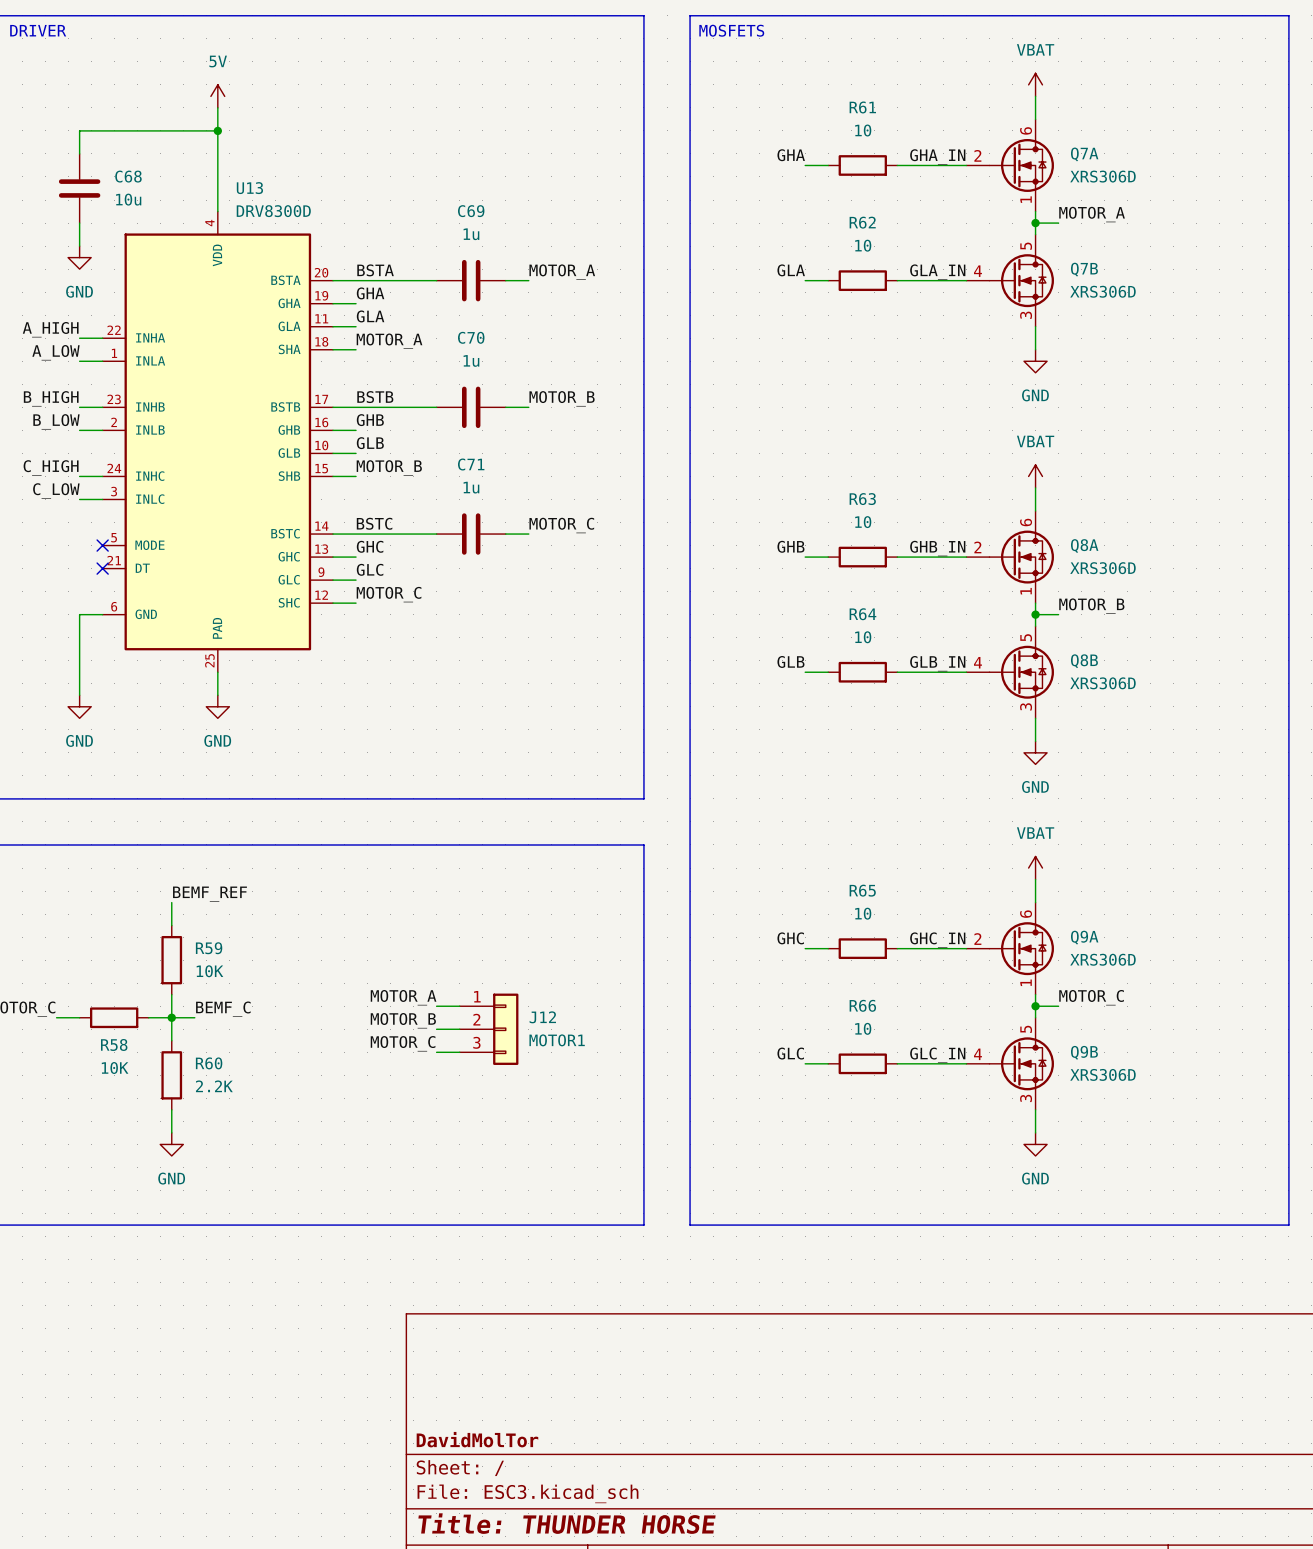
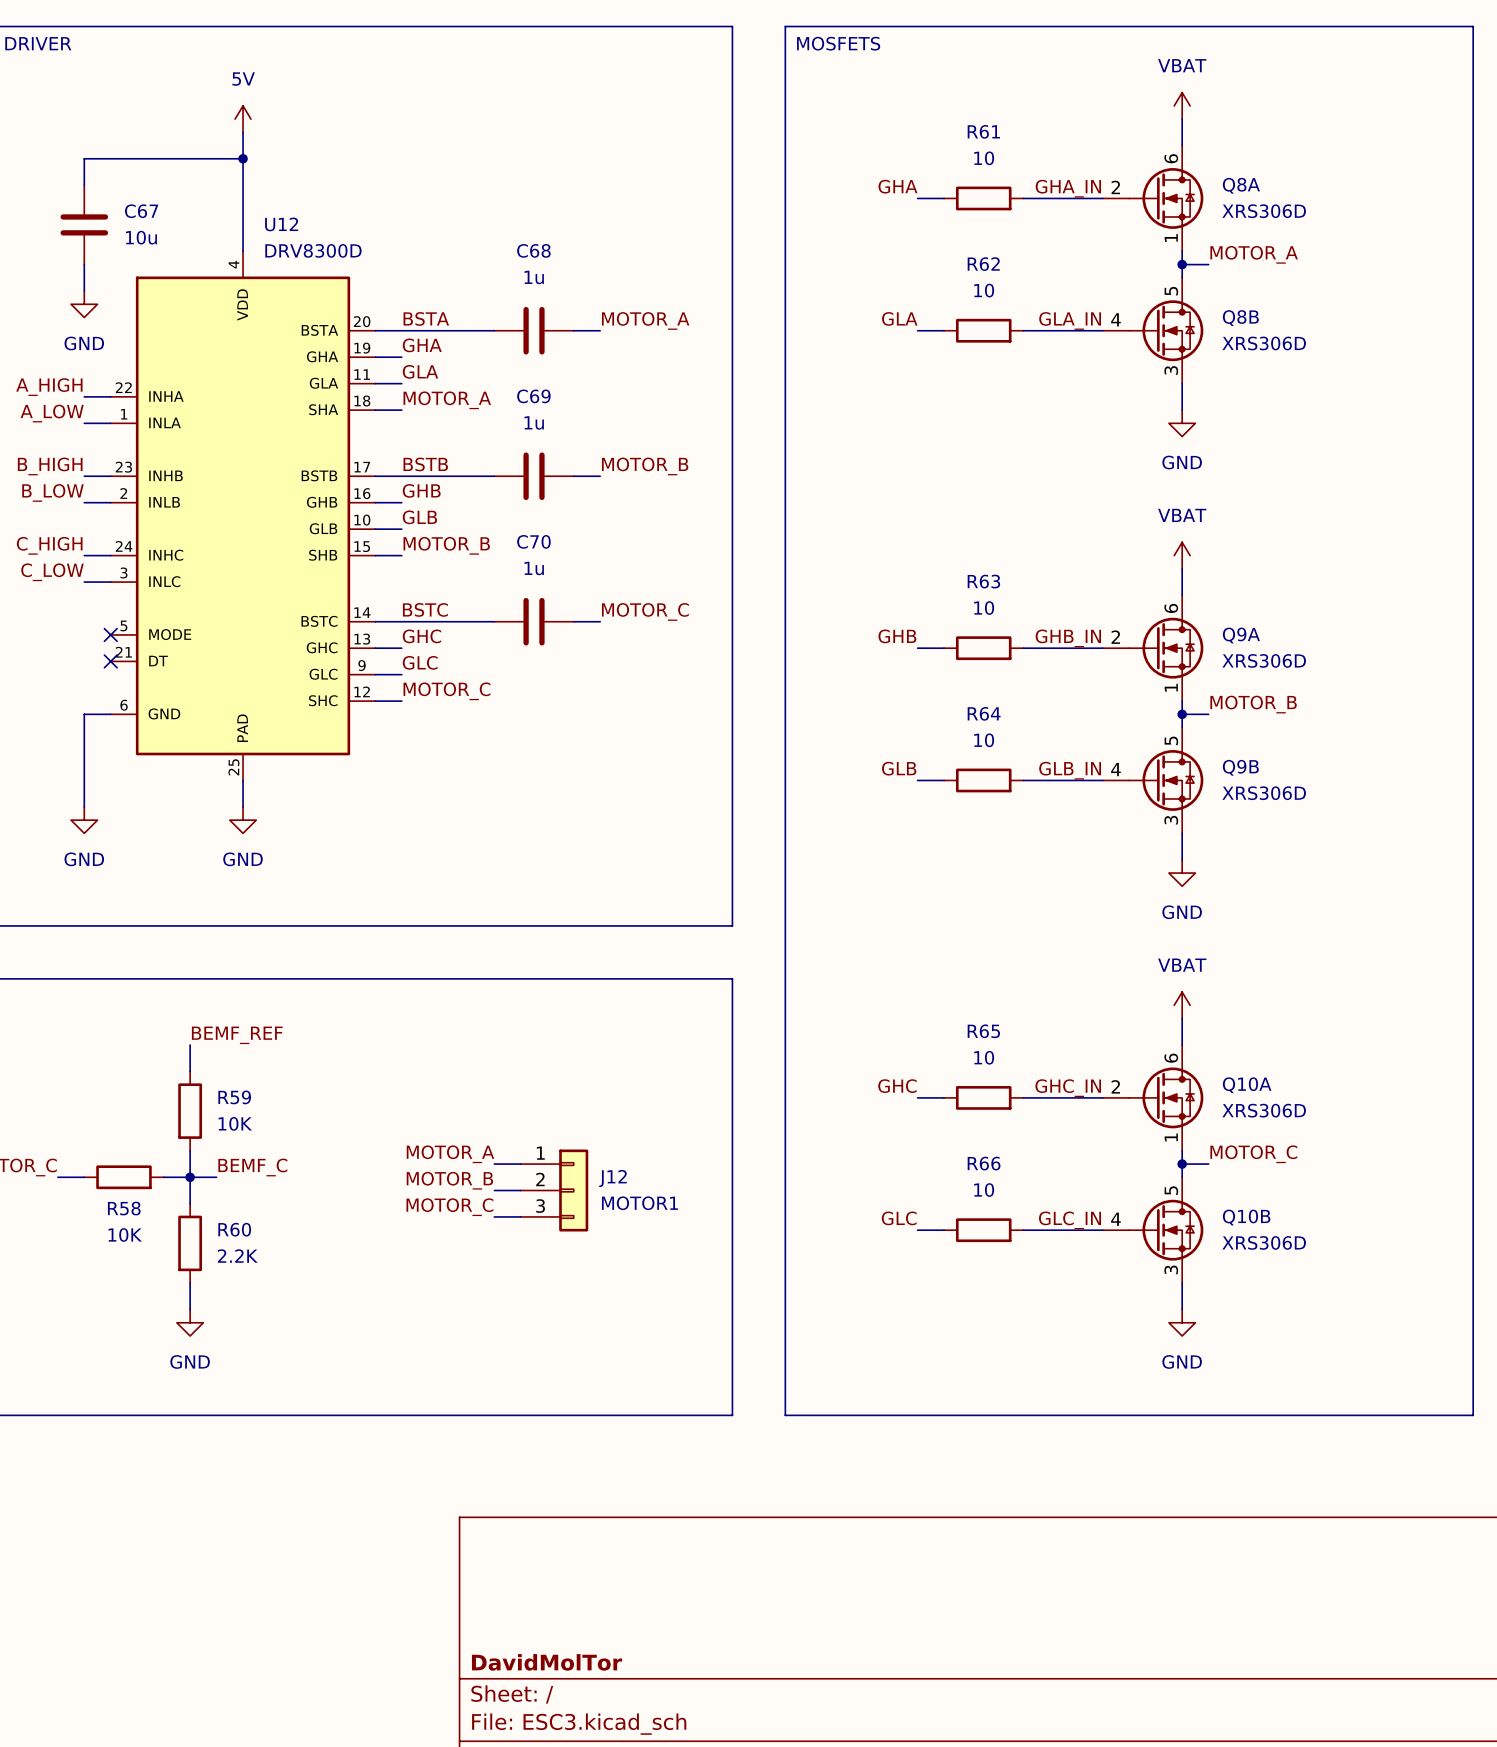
Q7A name: Q7A (1084, 154) -> Q8A (1241, 185)
C68 name: C68 (128, 176) -> C67 (141, 211)
U13 name: U13 (249, 188) -> U12 (281, 224)
C69 name: C69 (471, 211) -> C68 (533, 250)
Q7B name: Q7B (1084, 269) -> Q8B (1240, 318)
C70 name: C70 (471, 337) -> C69 (533, 396)
C71 name: C71 (471, 464) -> C70 (533, 541)
Q8A name: Q8A (1084, 546) -> Q9A (1241, 635)
Q8B name: Q8B (1084, 661) -> Q9B (1240, 767)
Q9A name: Q9A (1084, 937) -> Q10A (1247, 1085)
Q9B name: Q9B (1084, 1052) -> Q10B (1246, 1217)

